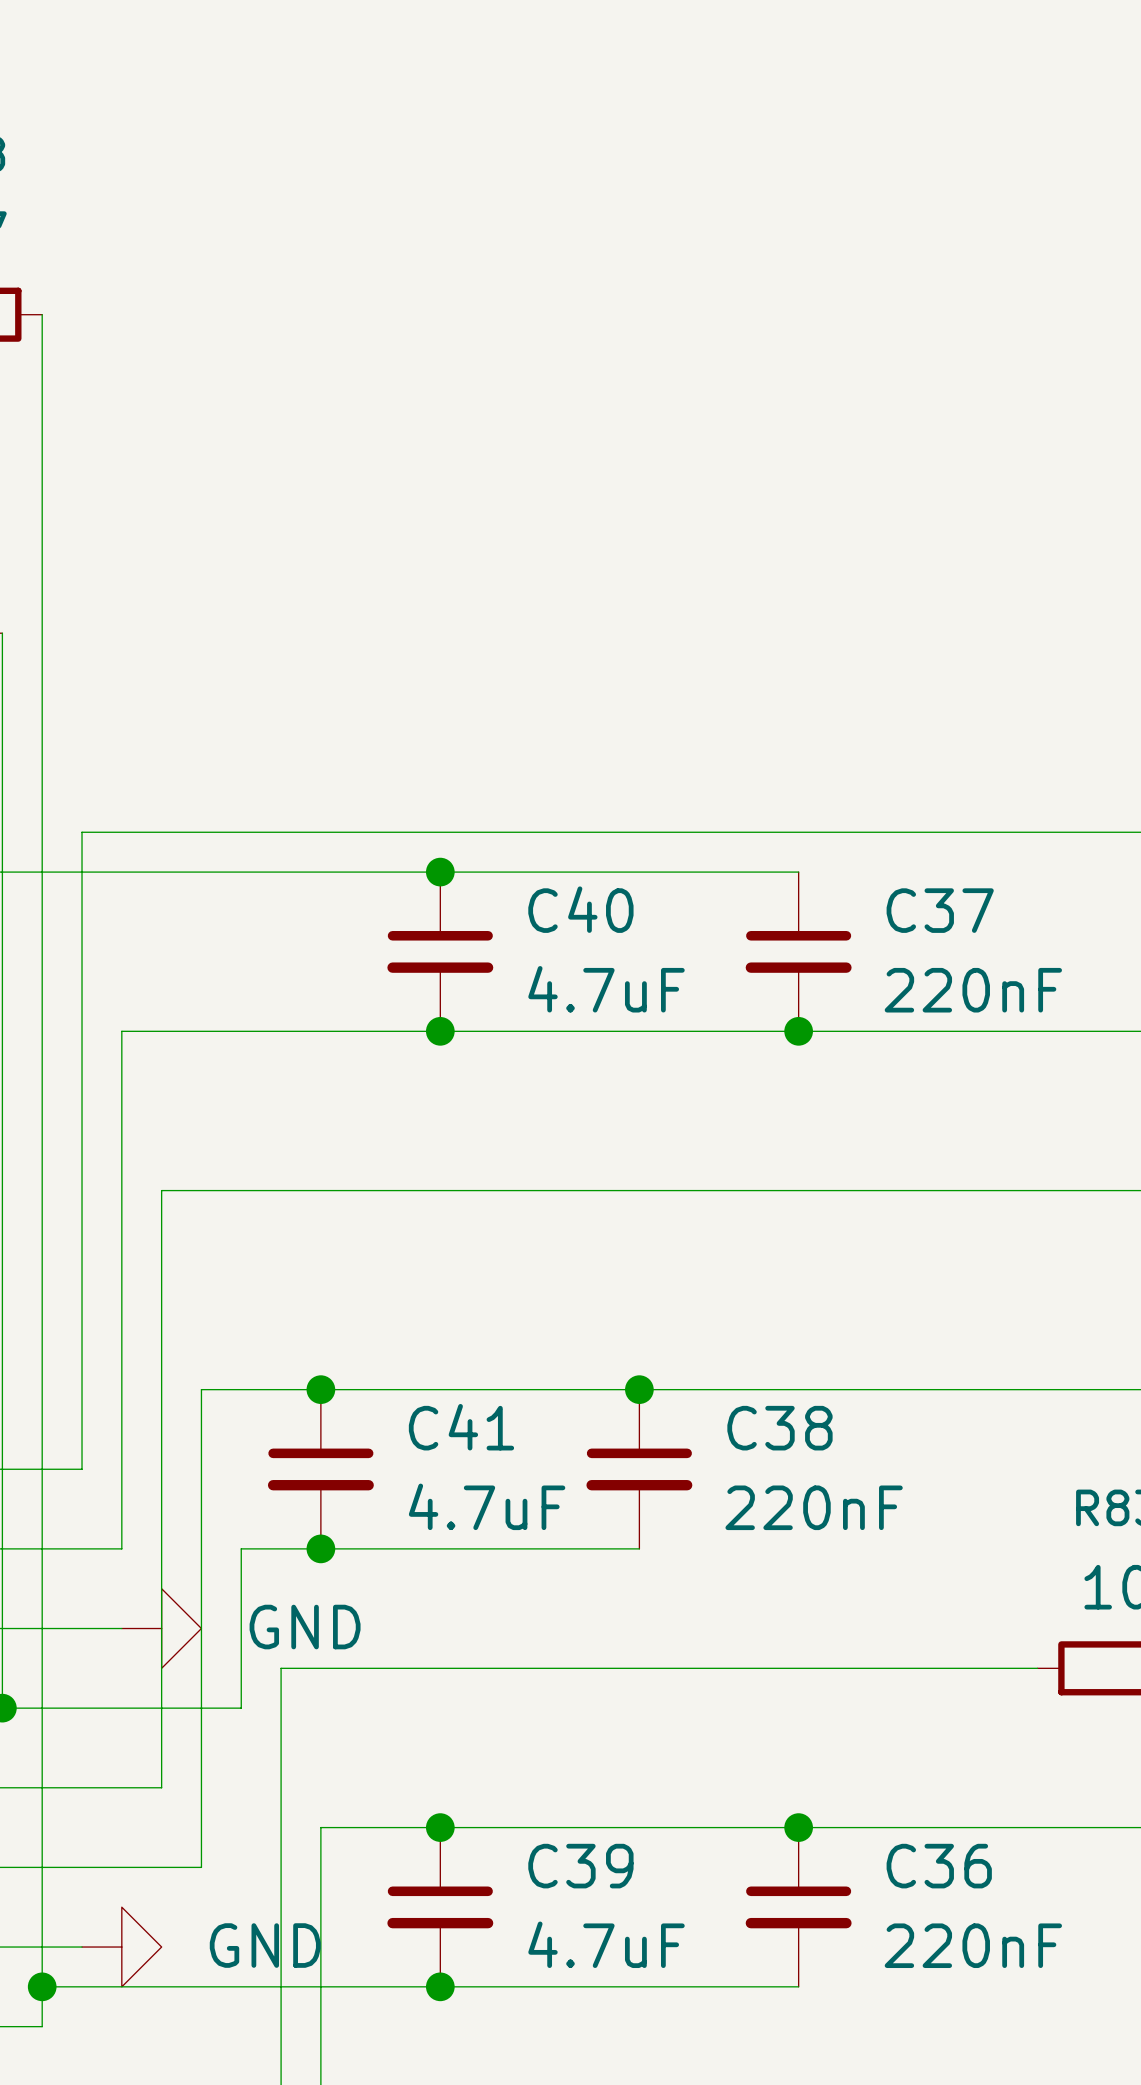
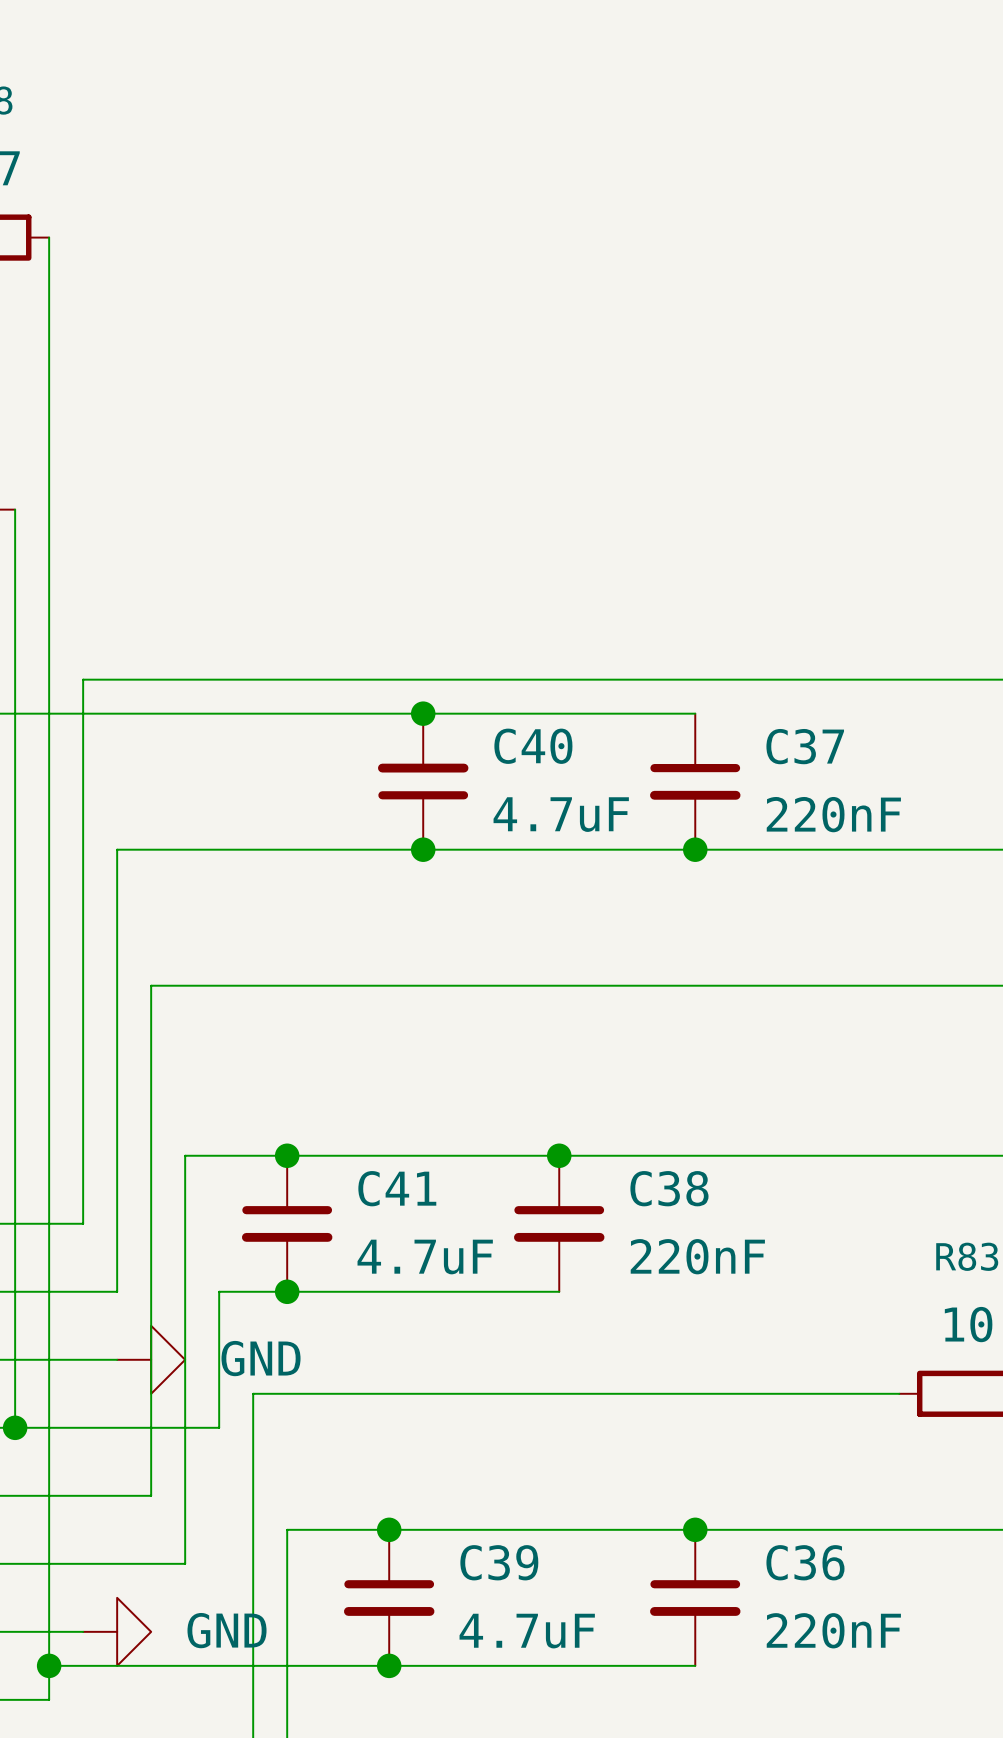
junction position: (440, 872) -> (423, 713)
C40 rotation: 0° (440, 951) -> 180° (423, 781)
junction position: (440, 1031) -> (423, 849)

